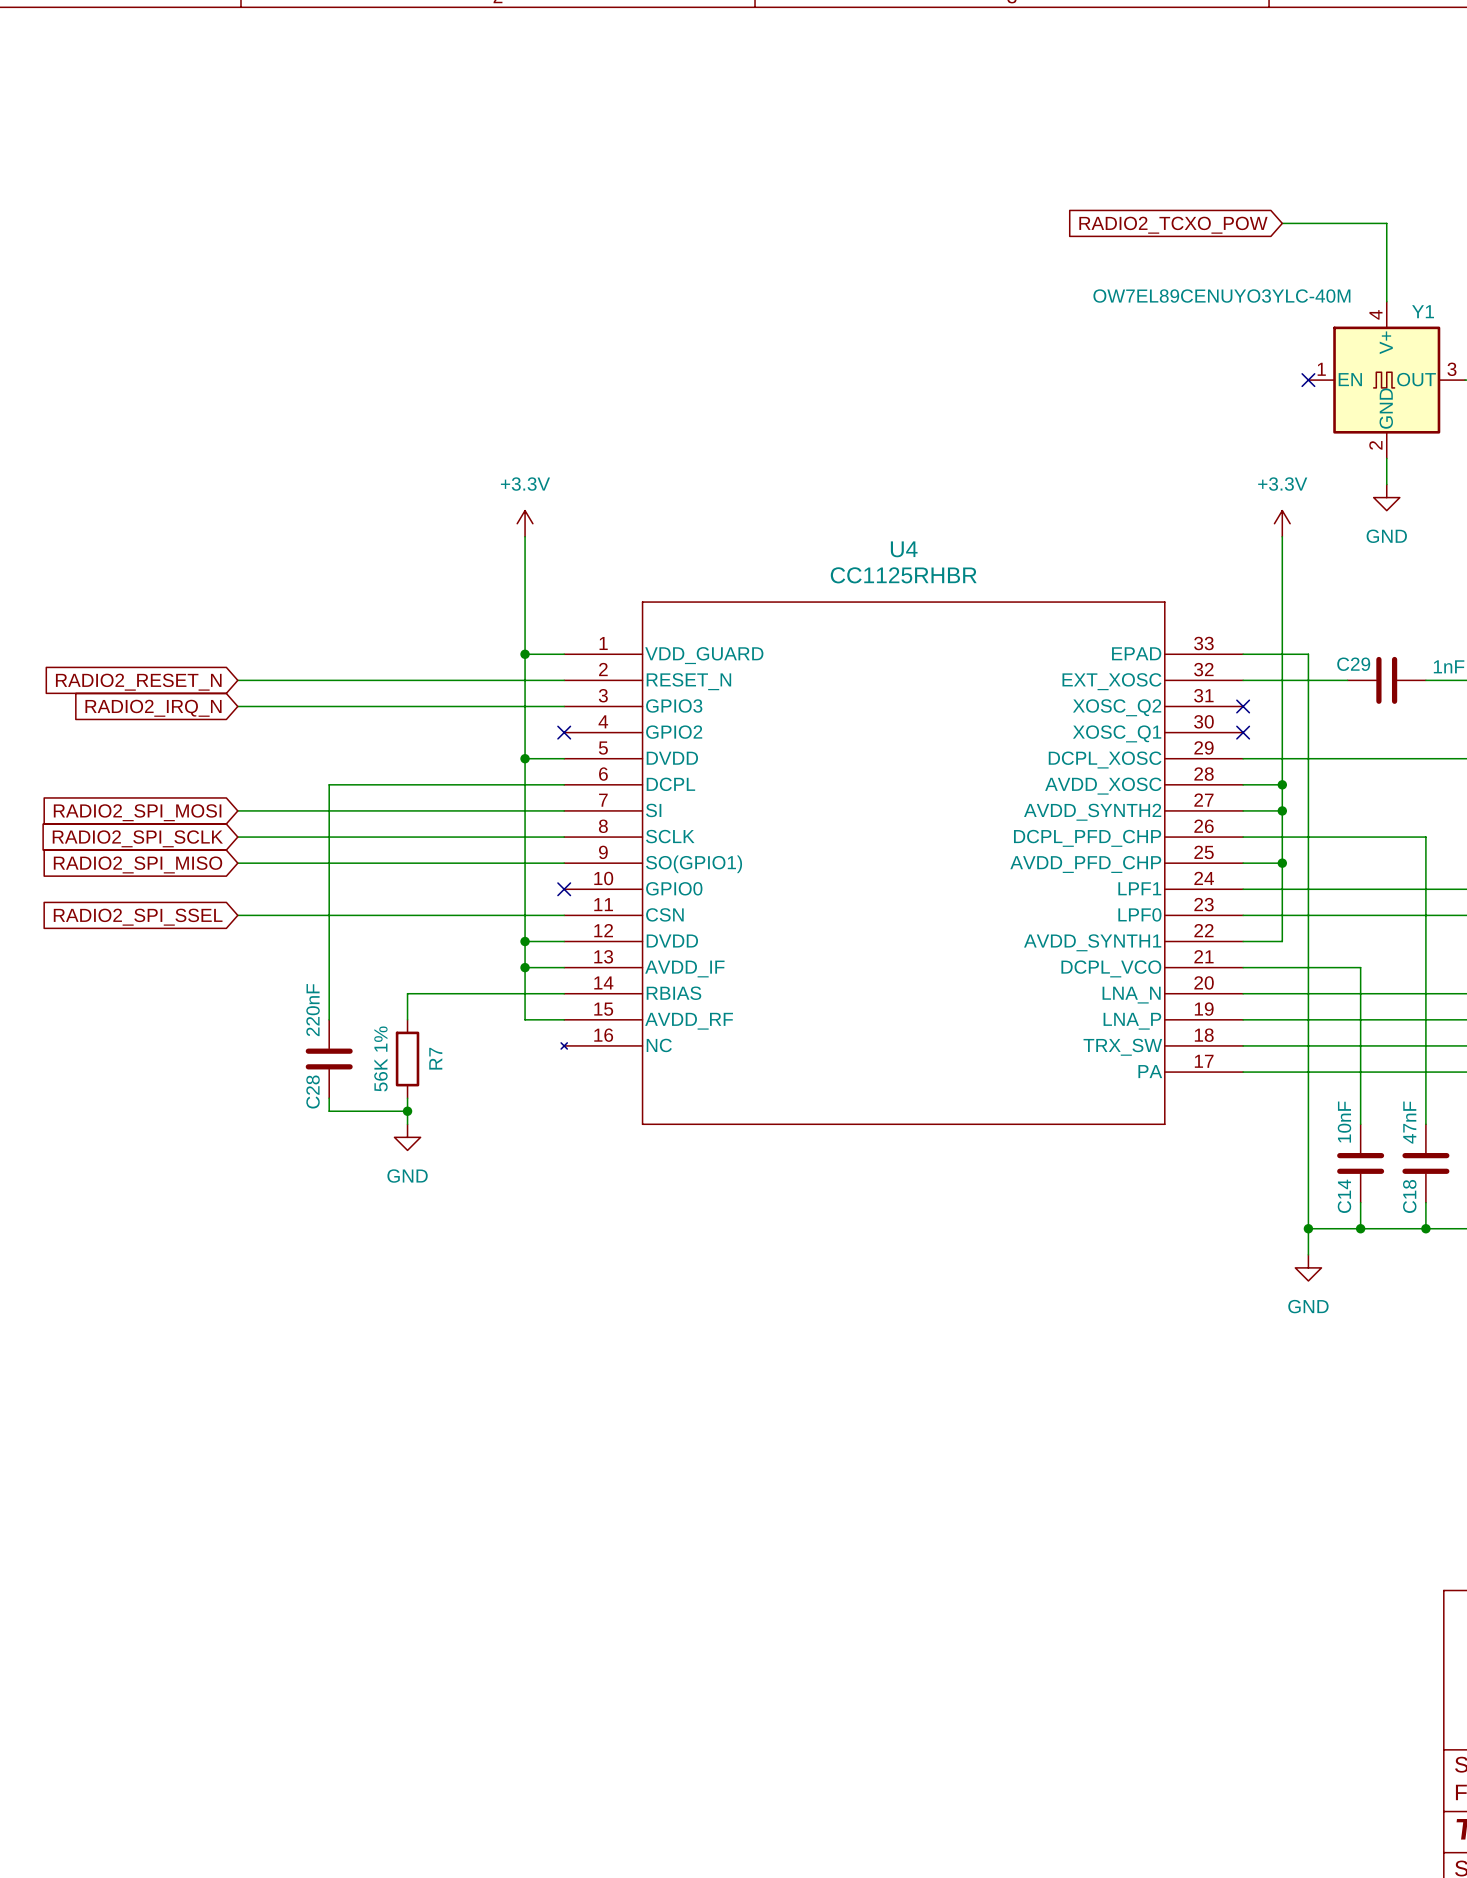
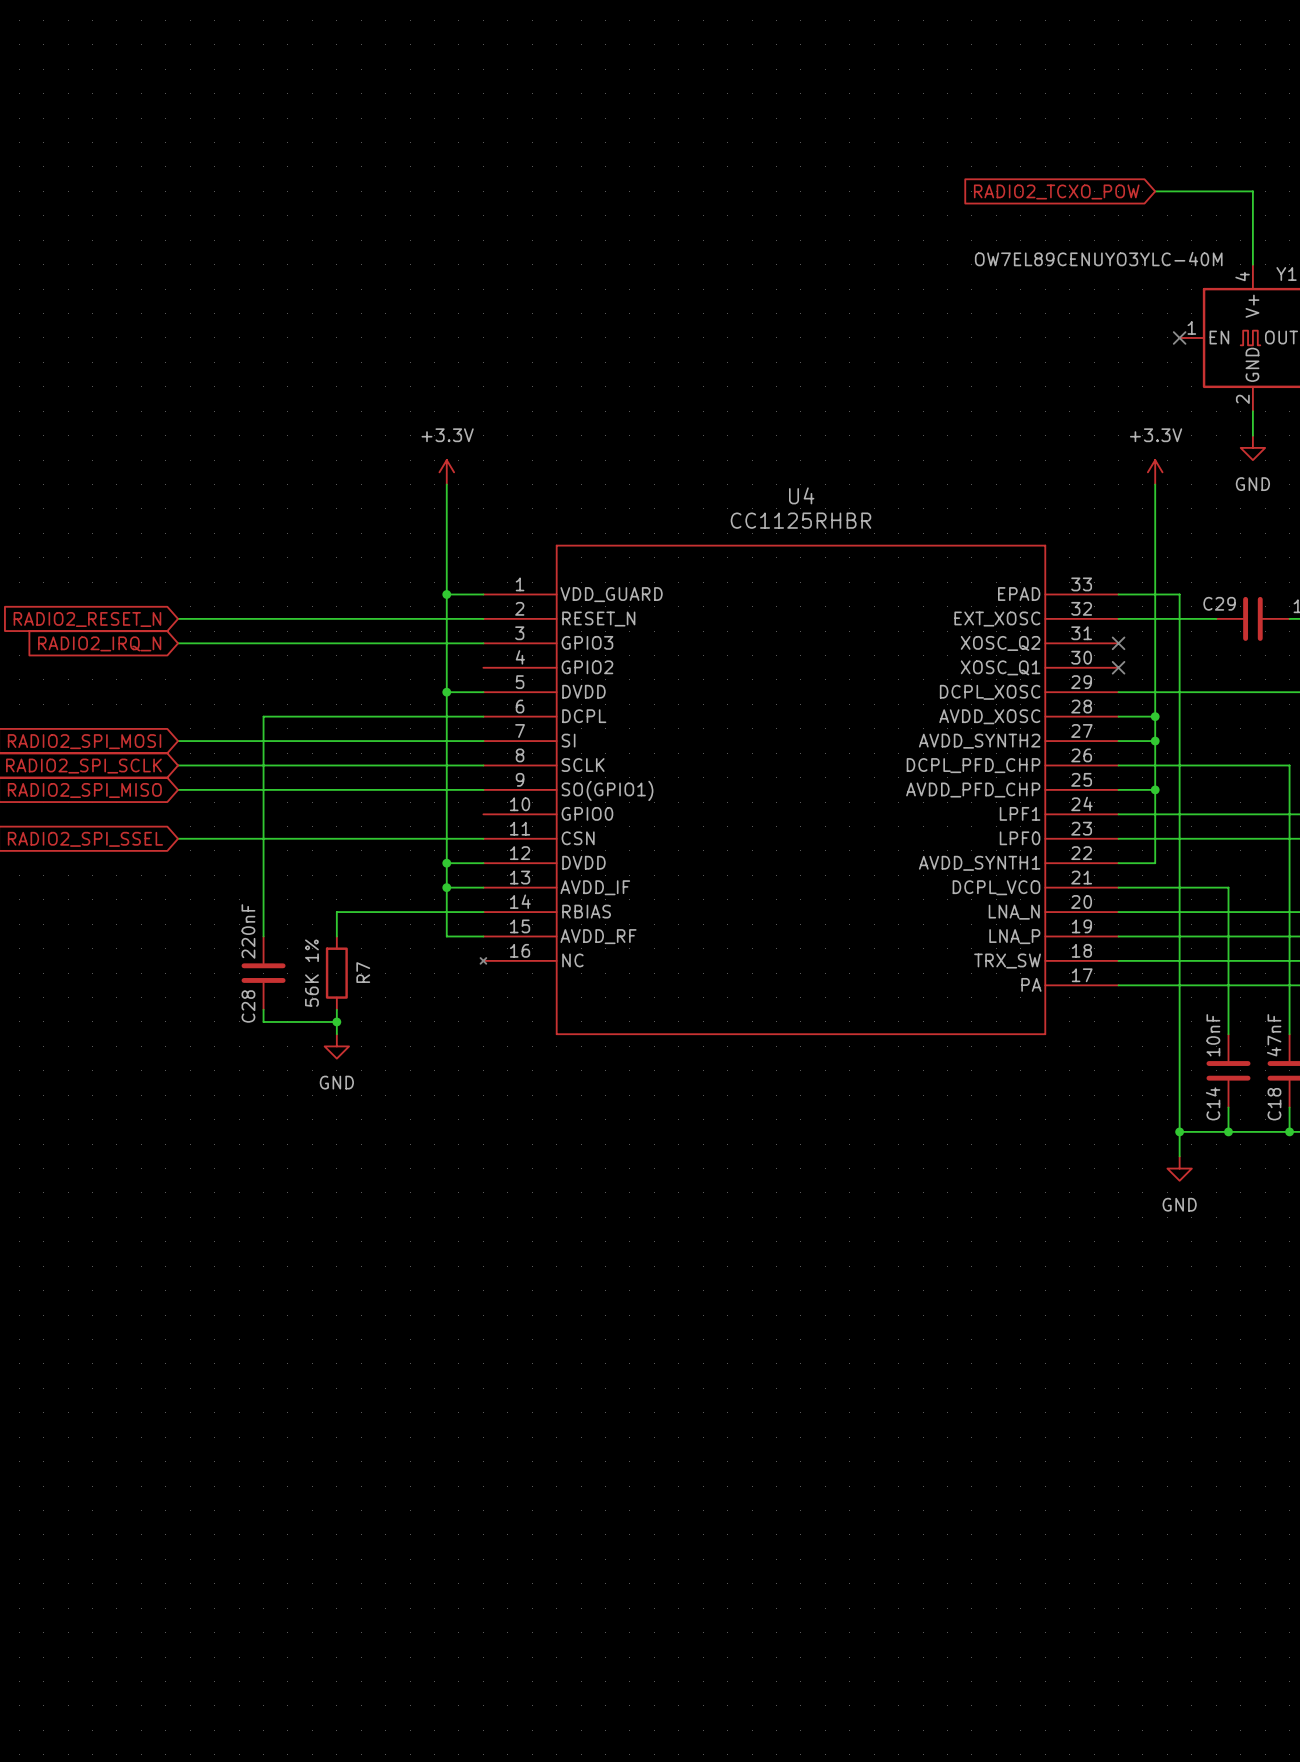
no-connect mark: (564, 732) -> none
no-connect mark: (564, 889) -> none

